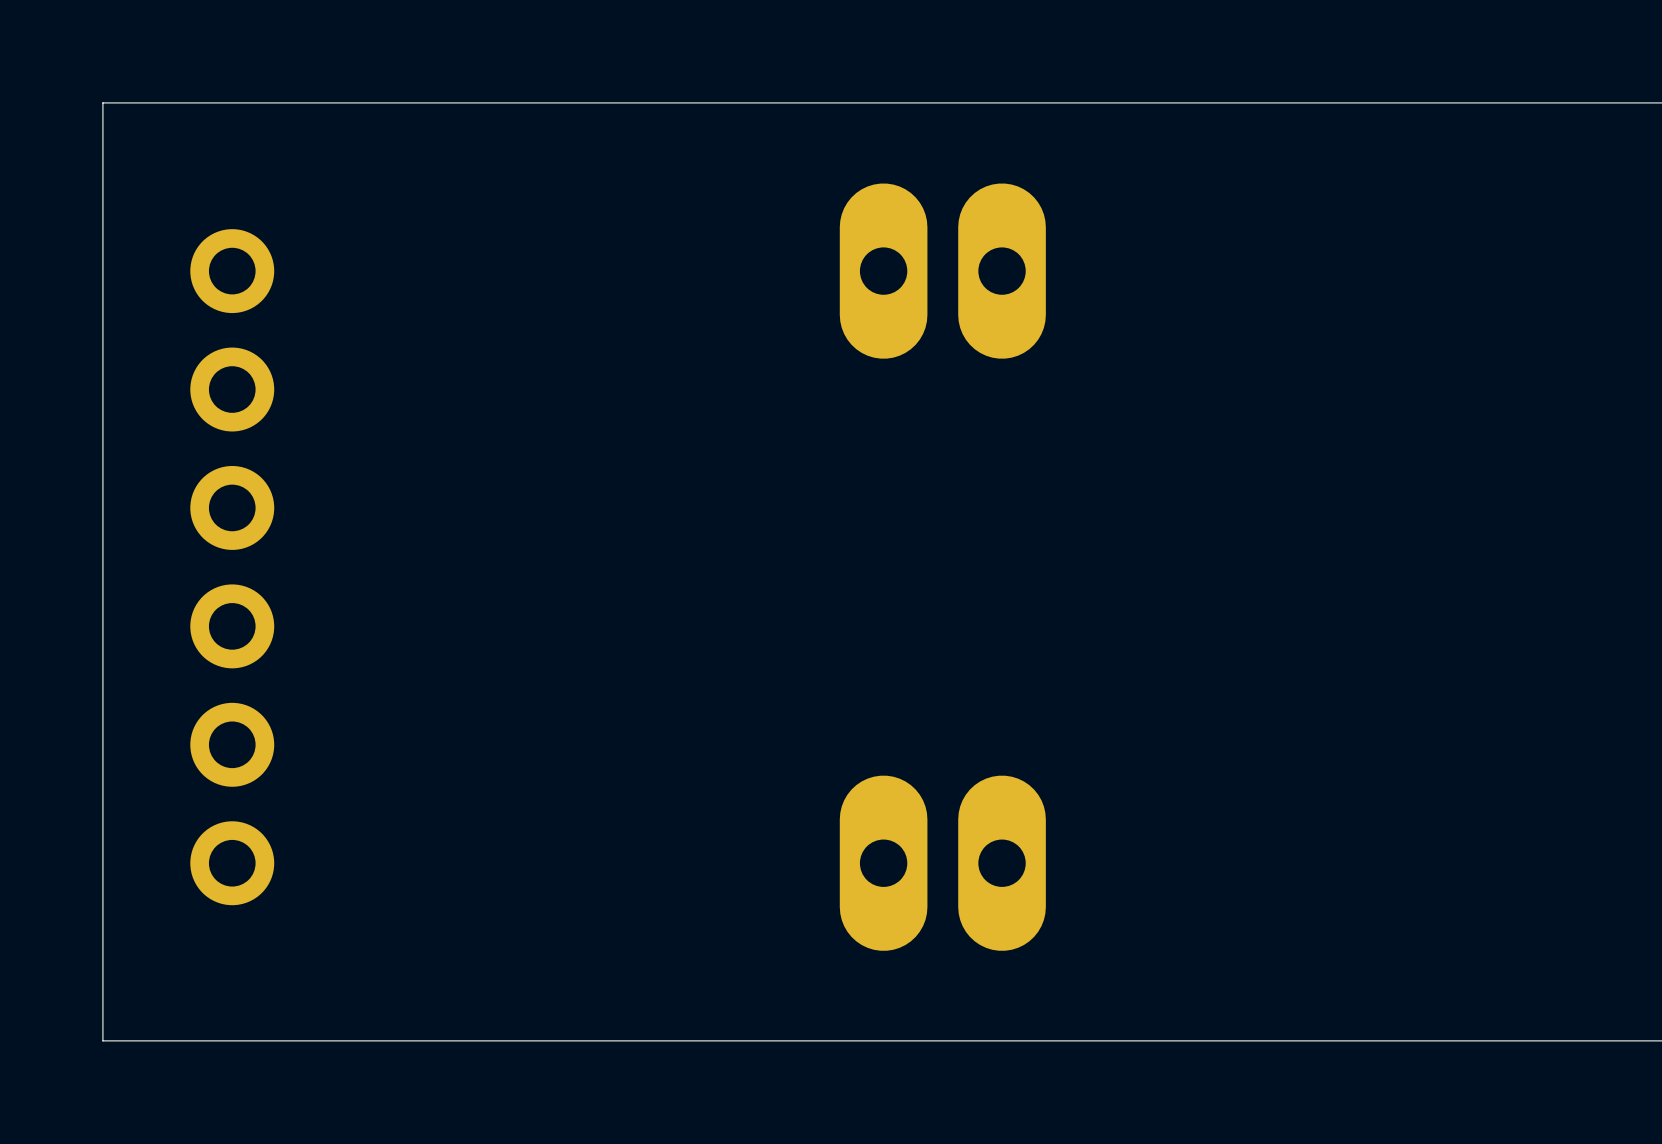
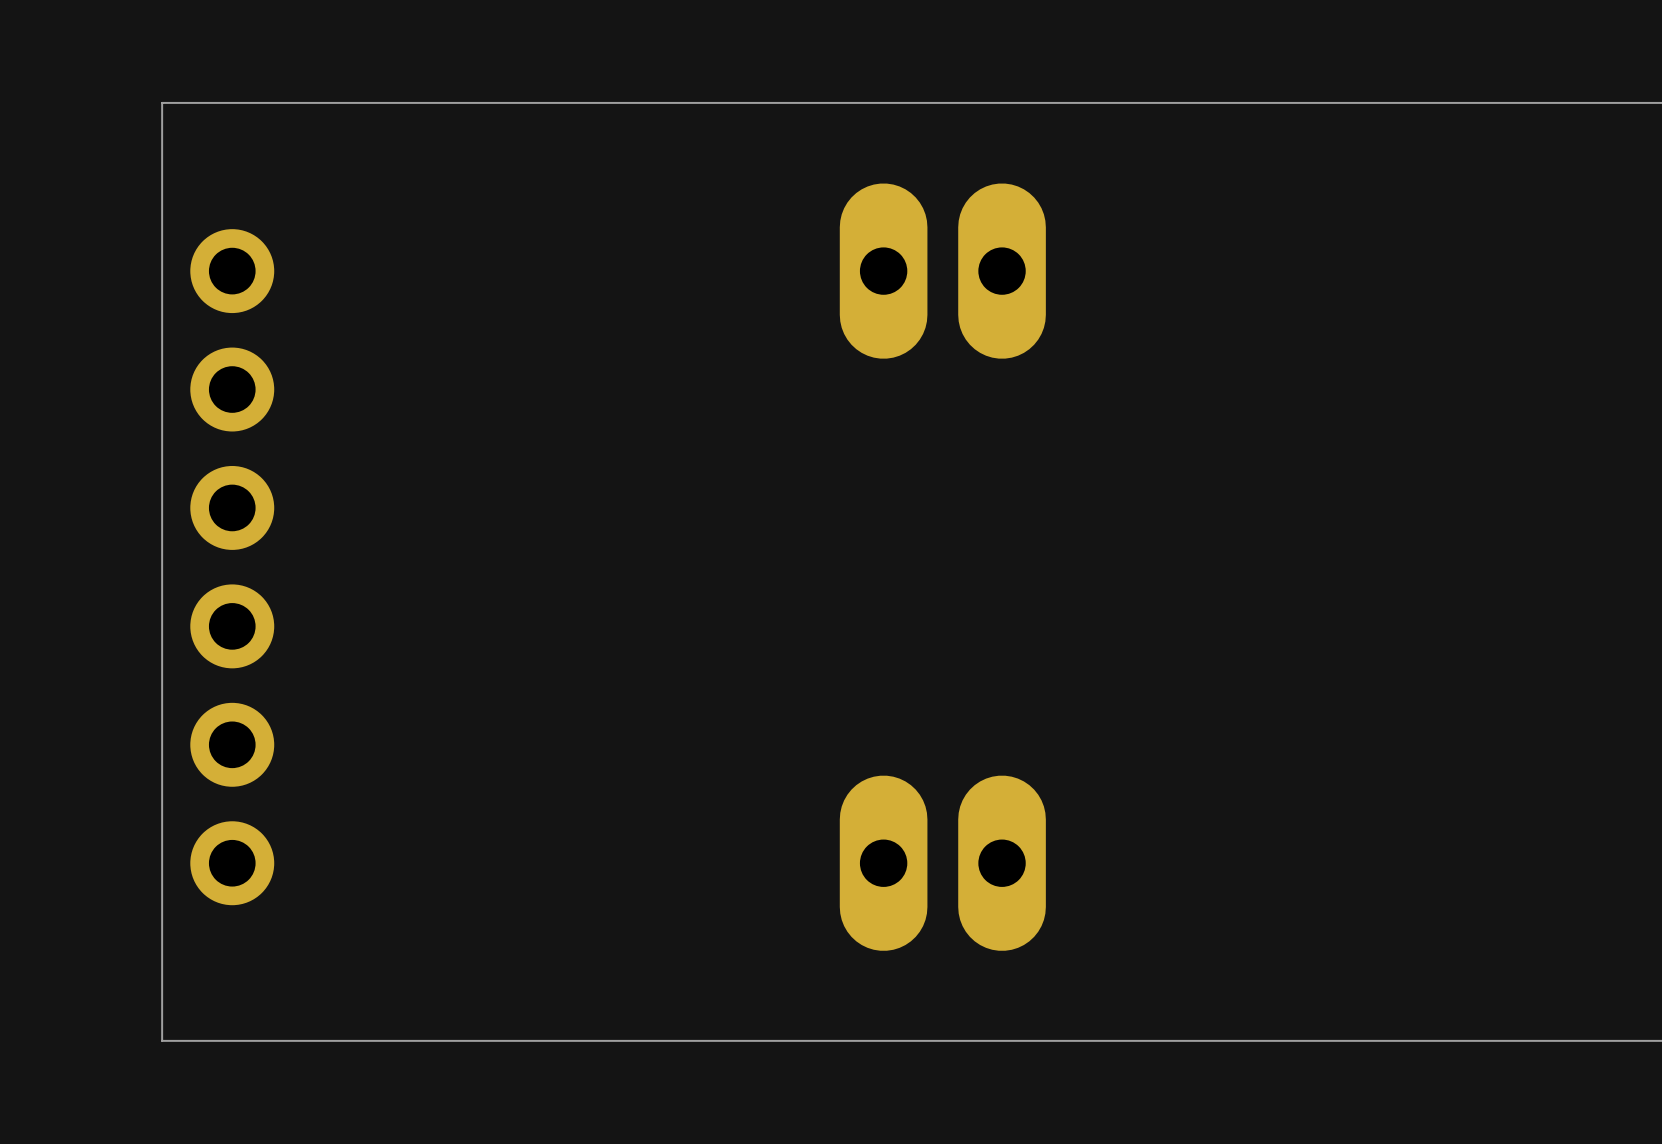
board edge: (162, 102) (102, 102) (102, 1040) (162, 1040) -> (162, 102) (162, 1040)

